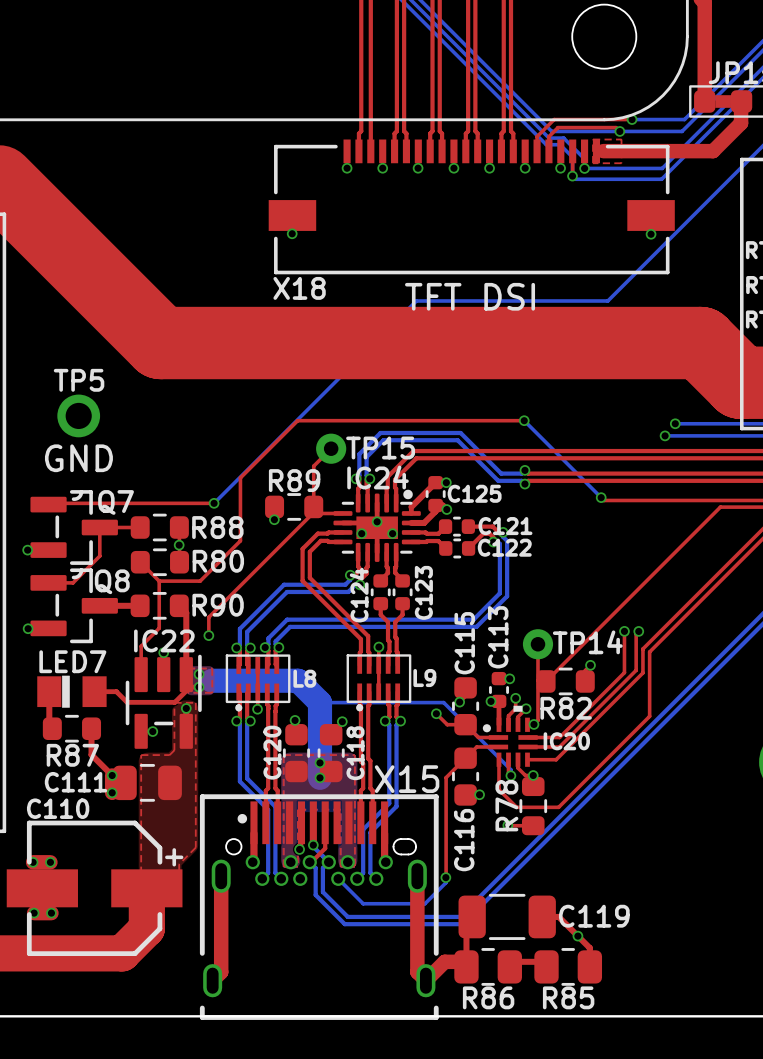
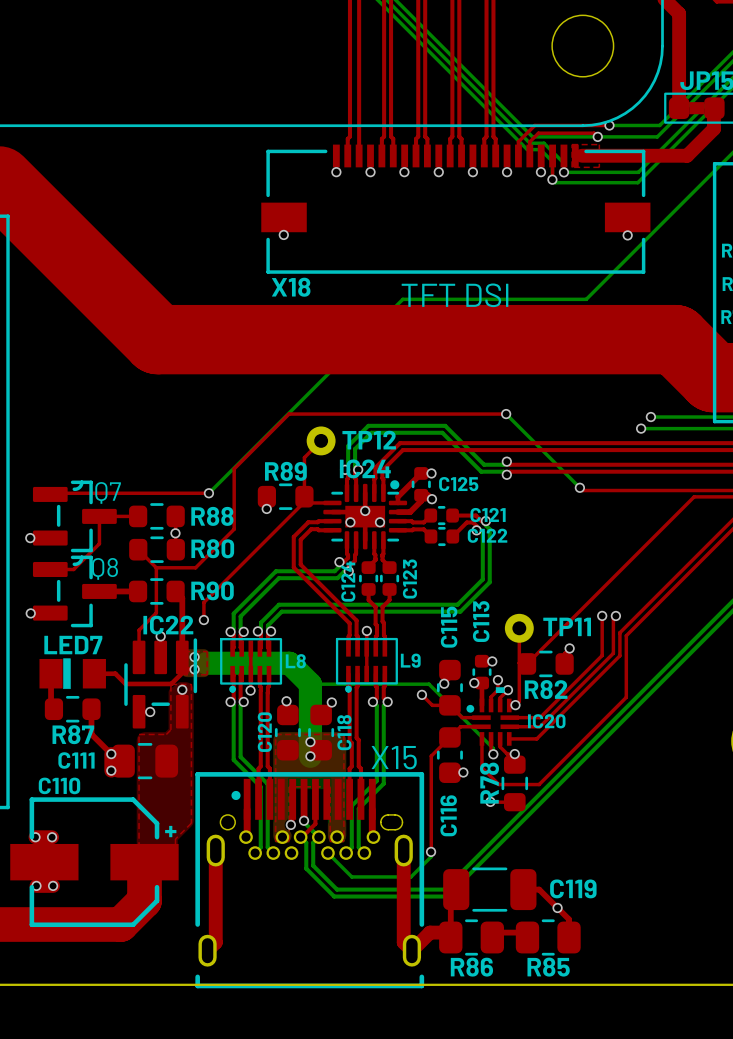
TP5: (78, 415) -> none
TP15 name: TP15 (380, 447) -> TP12 (369, 440)
TP14 name: TP14 (587, 642) -> TP11 (567, 626)

